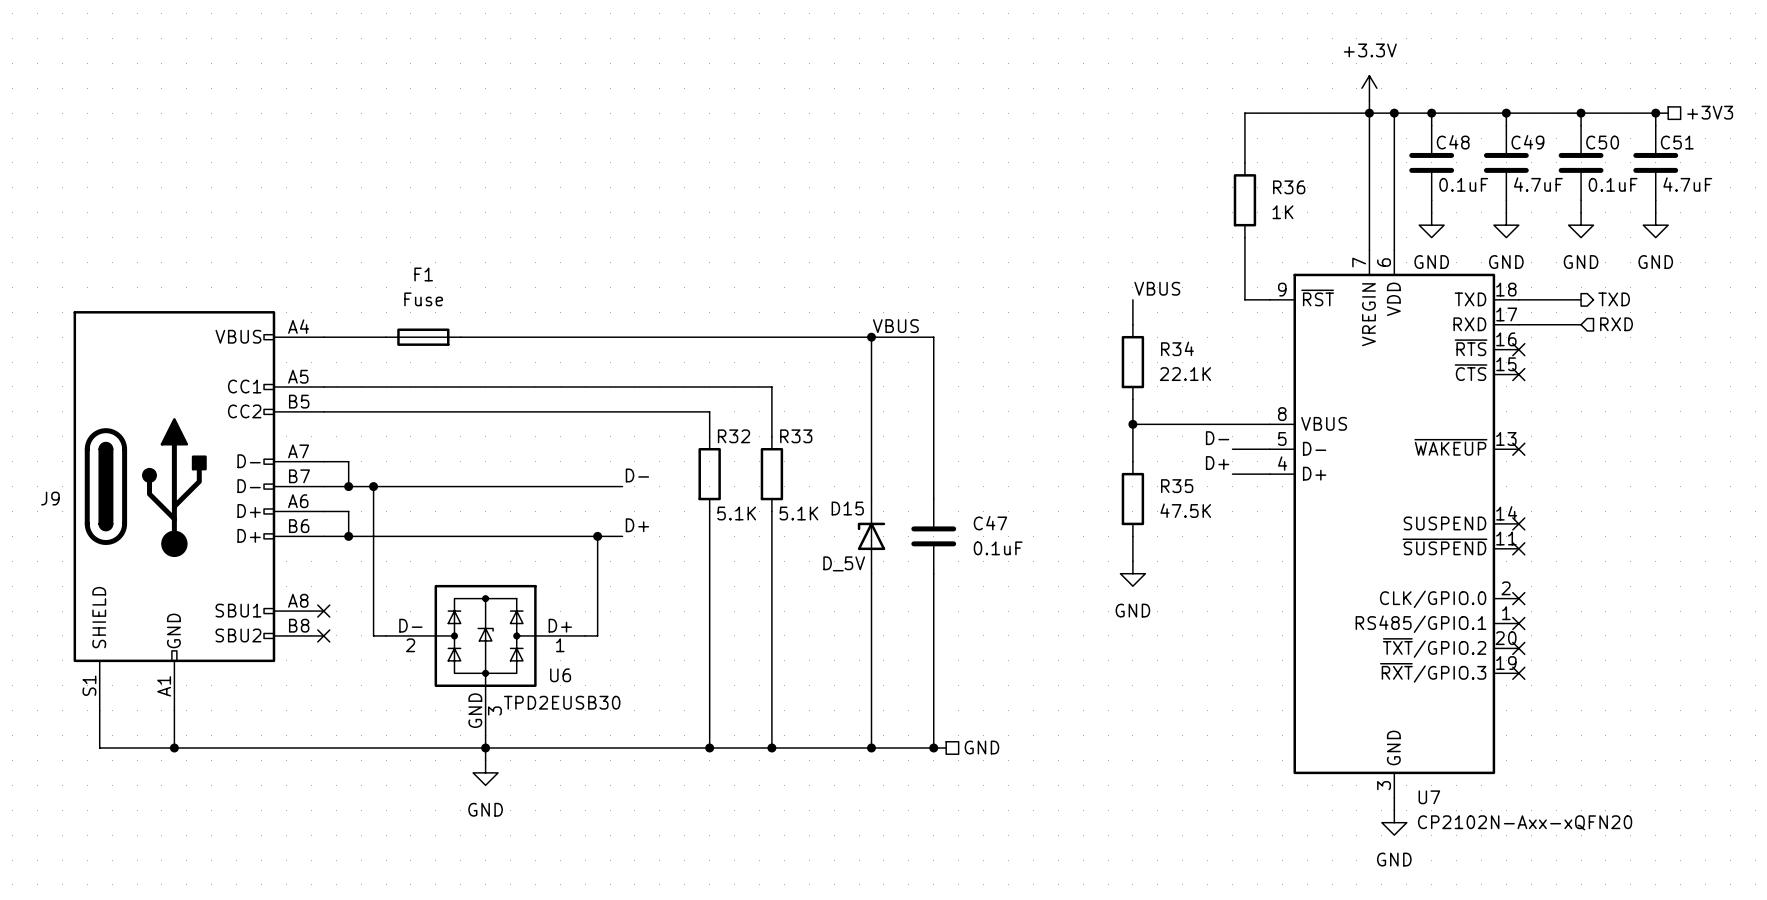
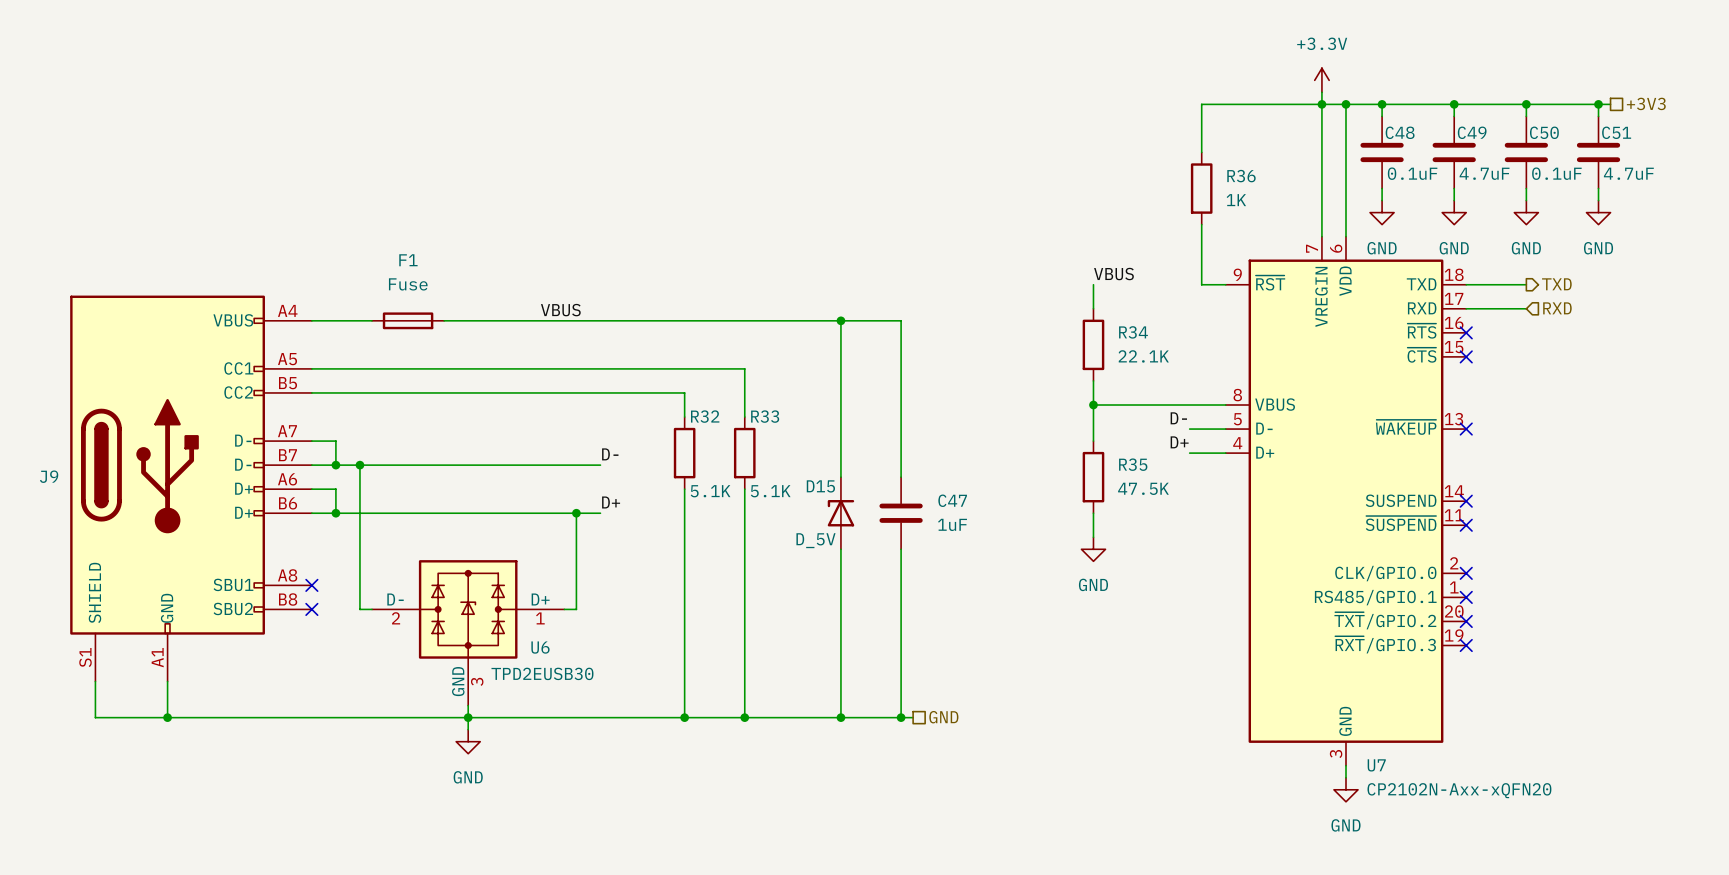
label: none -> VBUS (560, 310)
label: VBUS (895, 326) -> none
C47 value: 0.1uF (998, 548) -> 1uF (952, 524)

